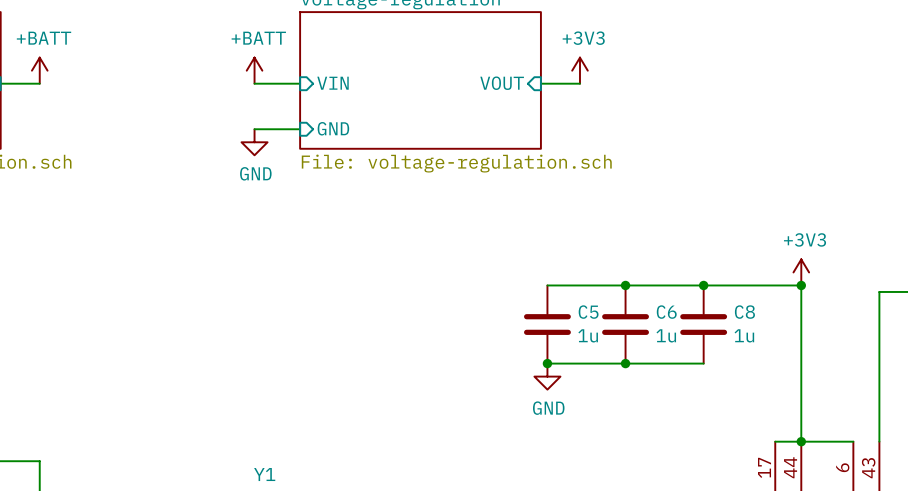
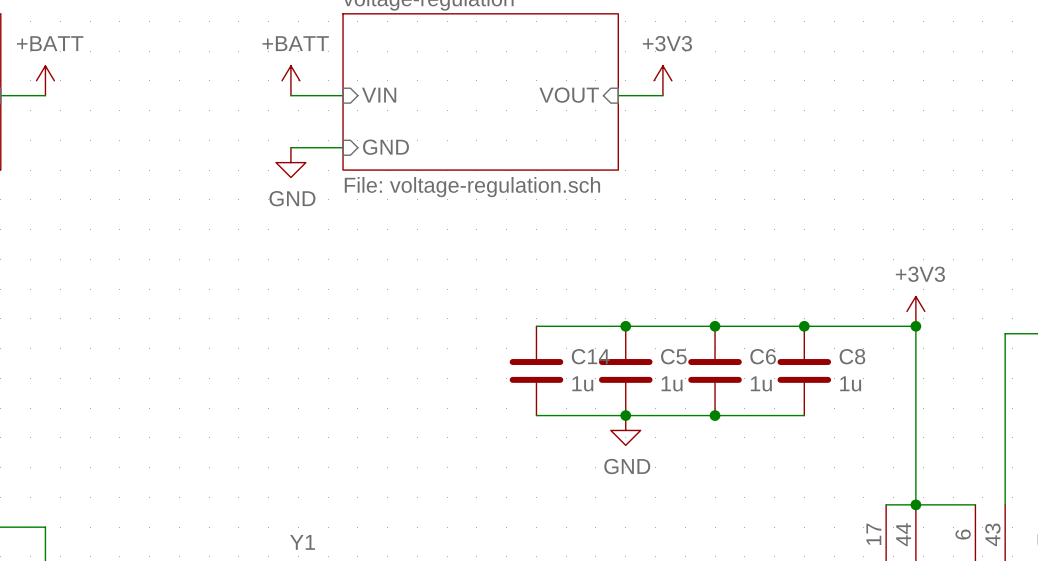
wire: none -> (536, 326) (625, 326)
junction: none -> (625, 326)
C14: none -> 1u (536, 370)
wire: none -> (536, 415) (625, 415)

